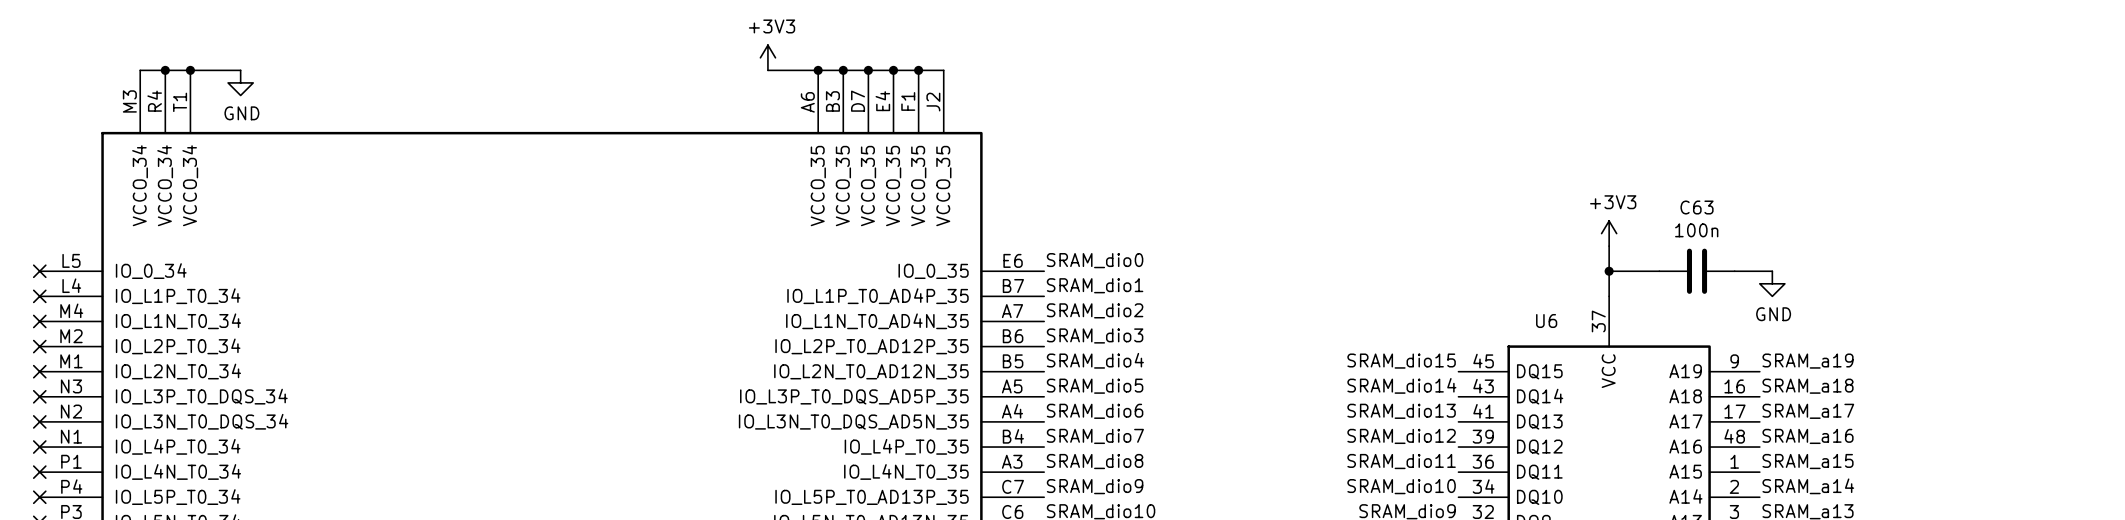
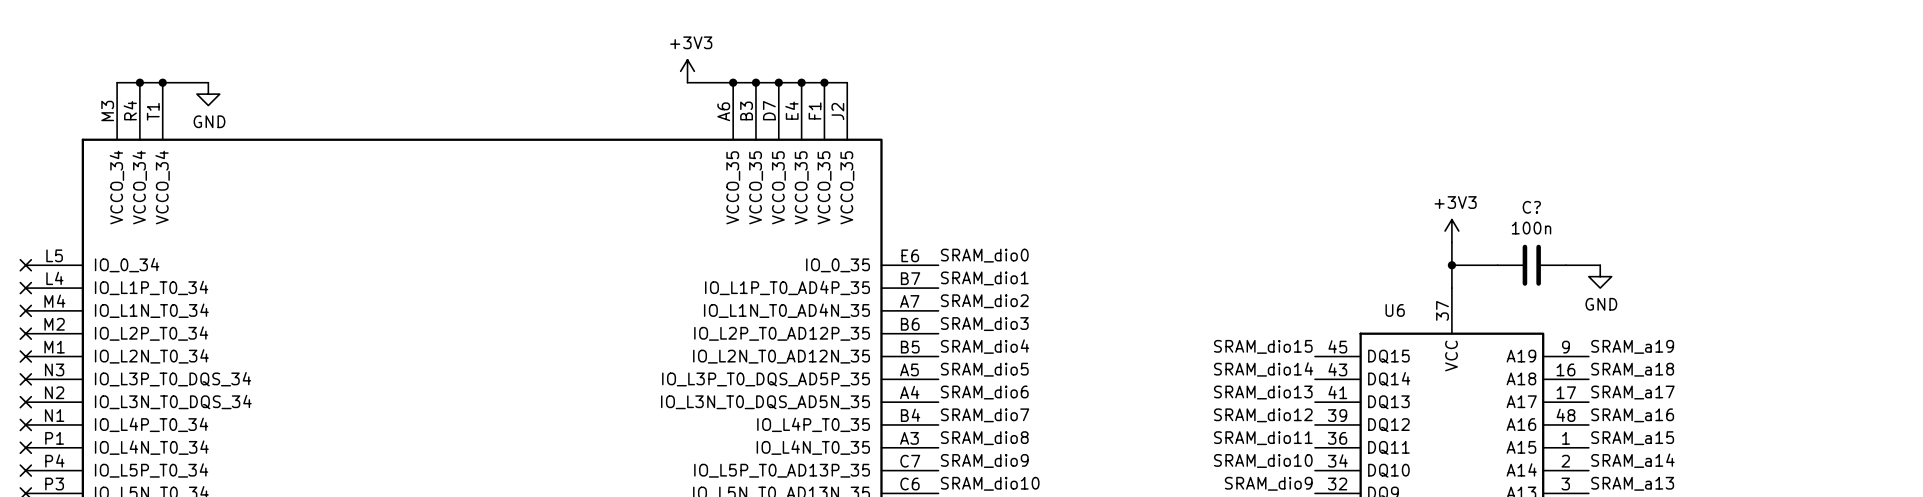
C63 name: C63 (1697, 207) -> C? (1531, 207)

